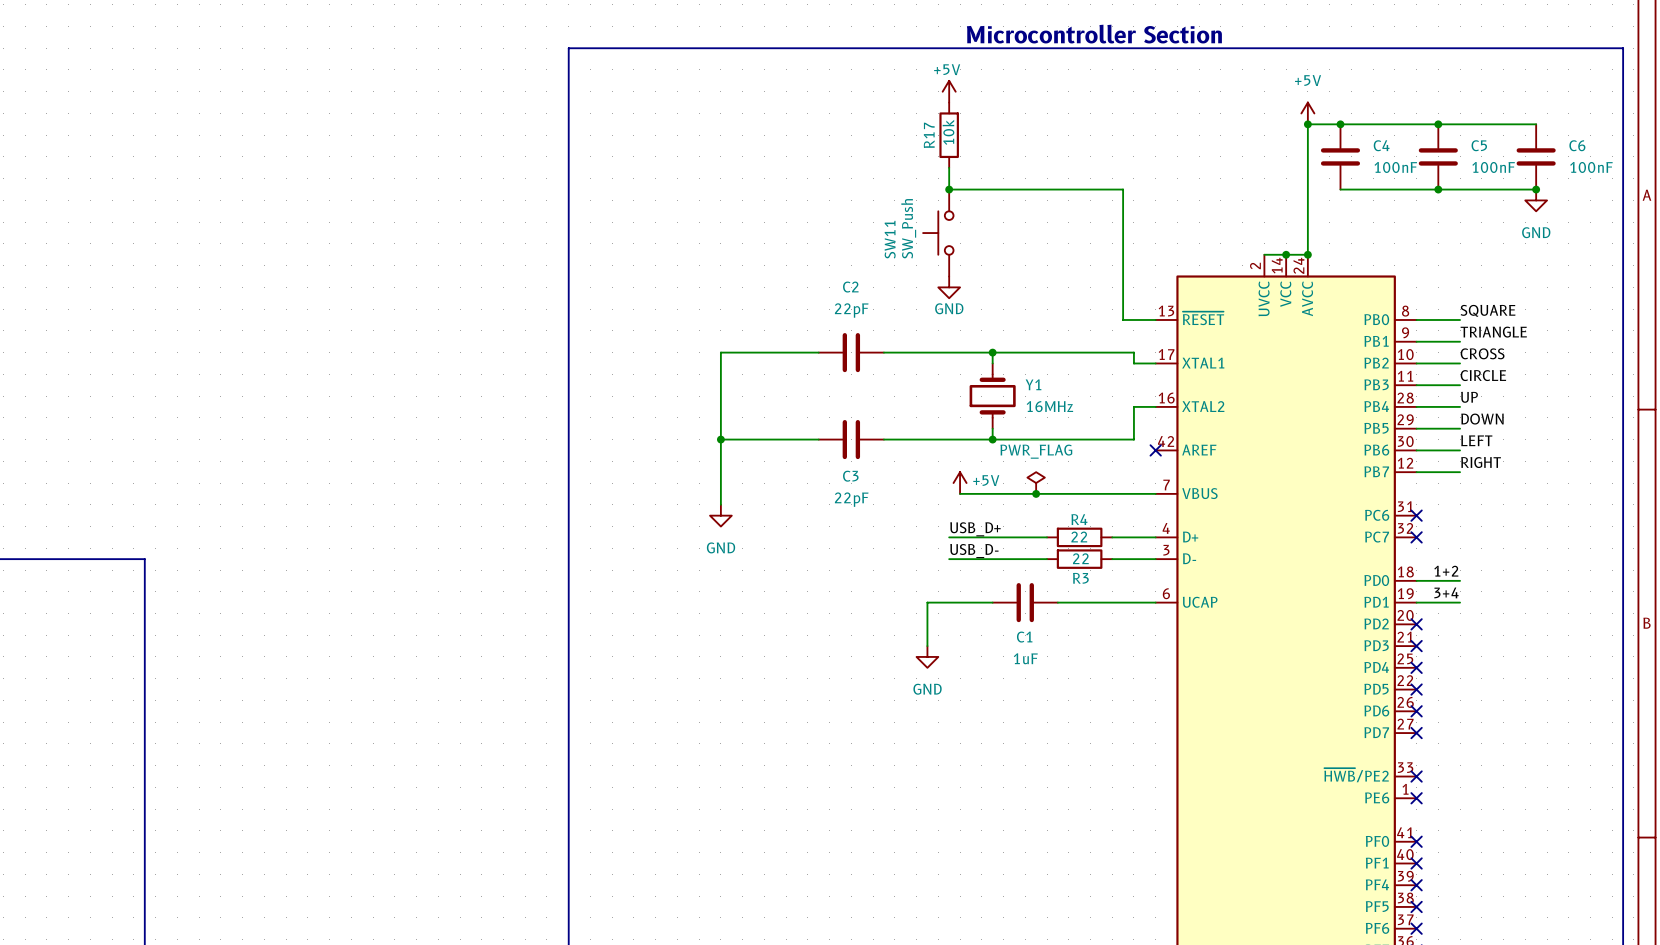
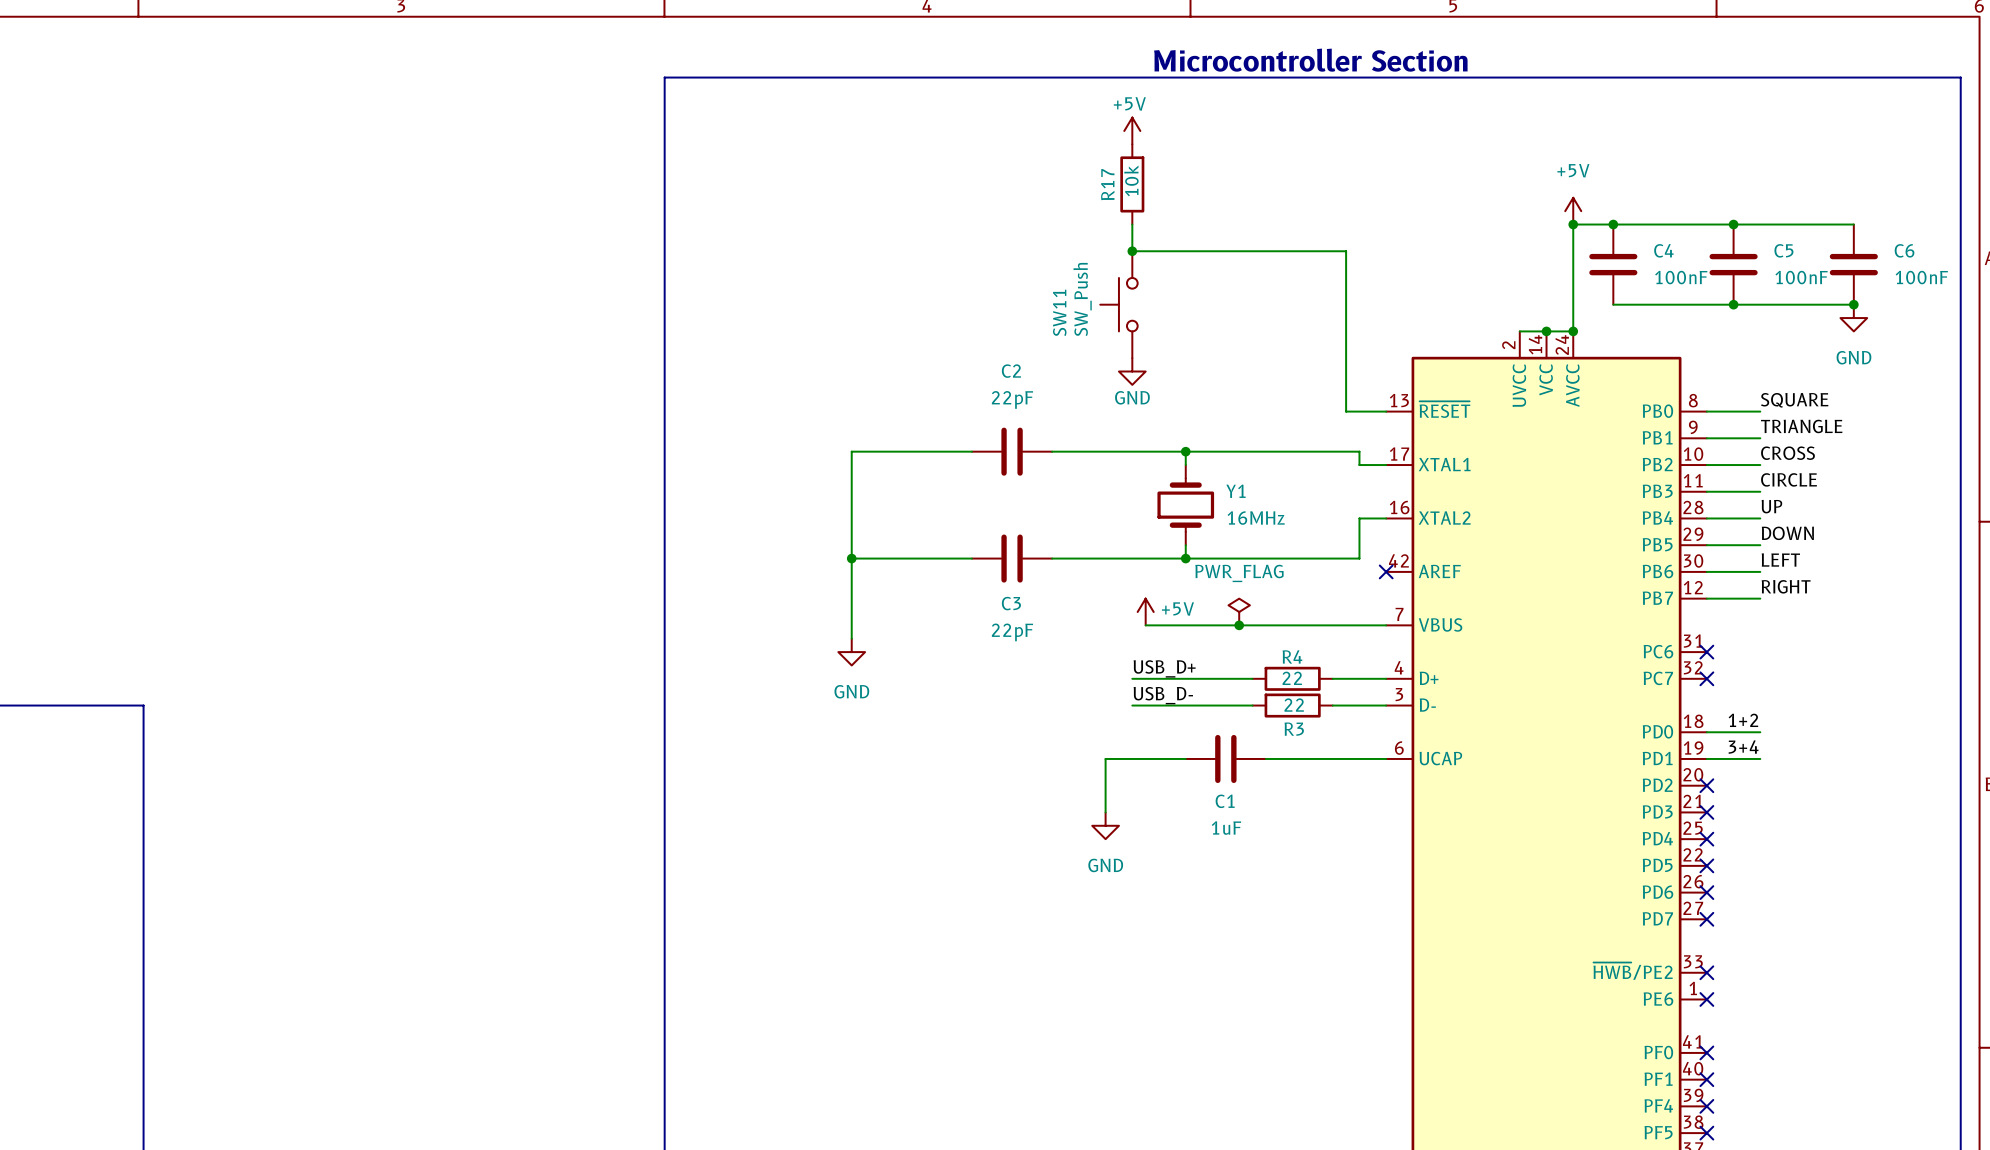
power symbol position: +5V (1307, 113) -> +5V (1573, 211)
junction: (1307, 124) -> none
junction: (1340, 124) -> none
junction: (1438, 124) -> none
wire: (1536, 124) (1307, 124) (1307, 167) -> (1853, 224) (1573, 224)
C4 position: (1340, 156) -> (1613, 264)
C5 position: (1438, 156) -> (1733, 264)
C6 position: (1536, 156) -> (1853, 264)
junction: none -> (1573, 224)
junction: none -> (1613, 224)
junction: none -> (1733, 224)
wire: (1340, 189) (1536, 189) -> (1613, 304) (1853, 304)
junction: (1438, 189) -> none
junction position: (1536, 189) -> (1853, 304)
power symbol position: GND (1536, 200) -> GND (1853, 318)
junction: none -> (1733, 304)

